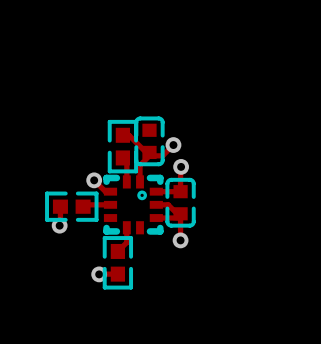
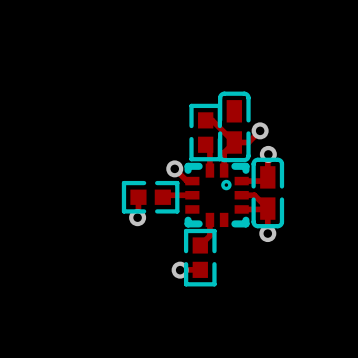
part footprint: [134, 116, 165, 167] -> [218, 91, 251, 163]
part footprint: [165, 177, 196, 228] -> [251, 157, 285, 229]

